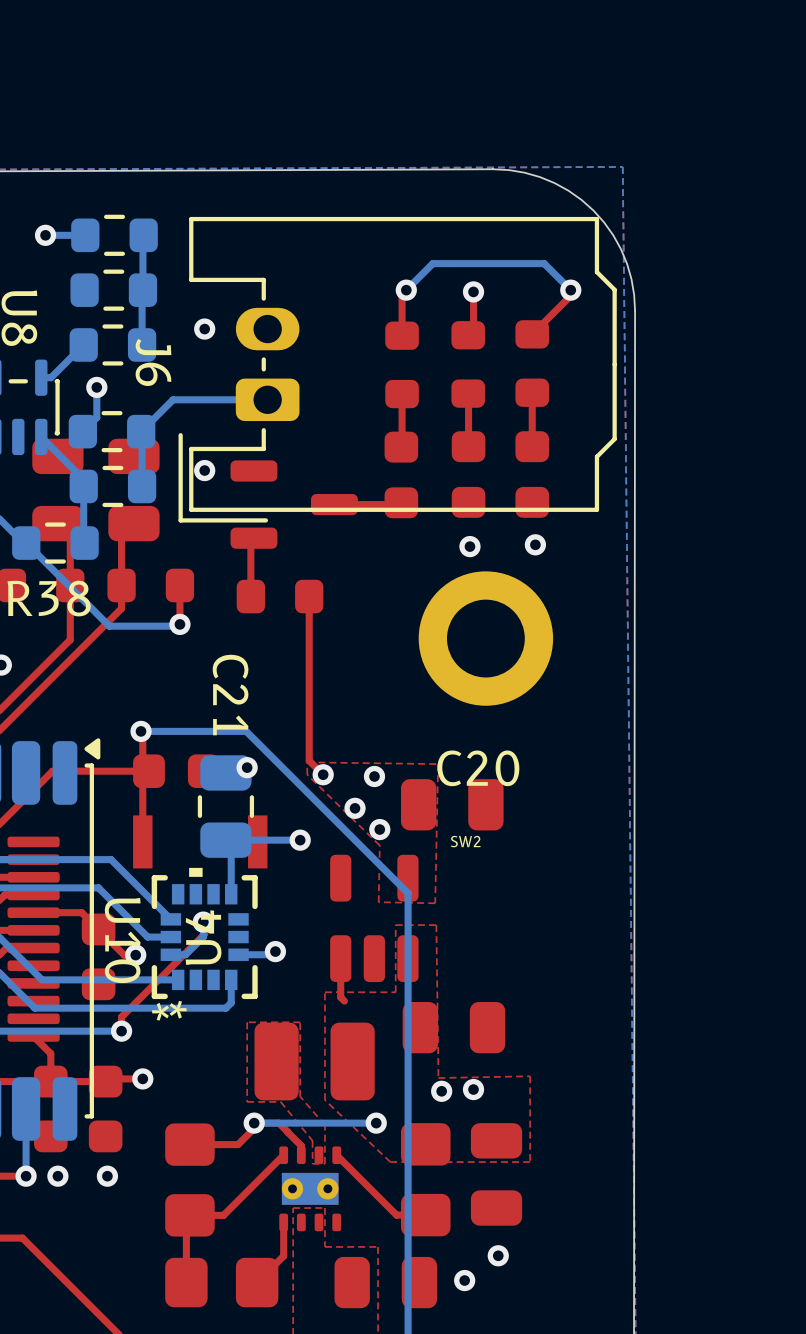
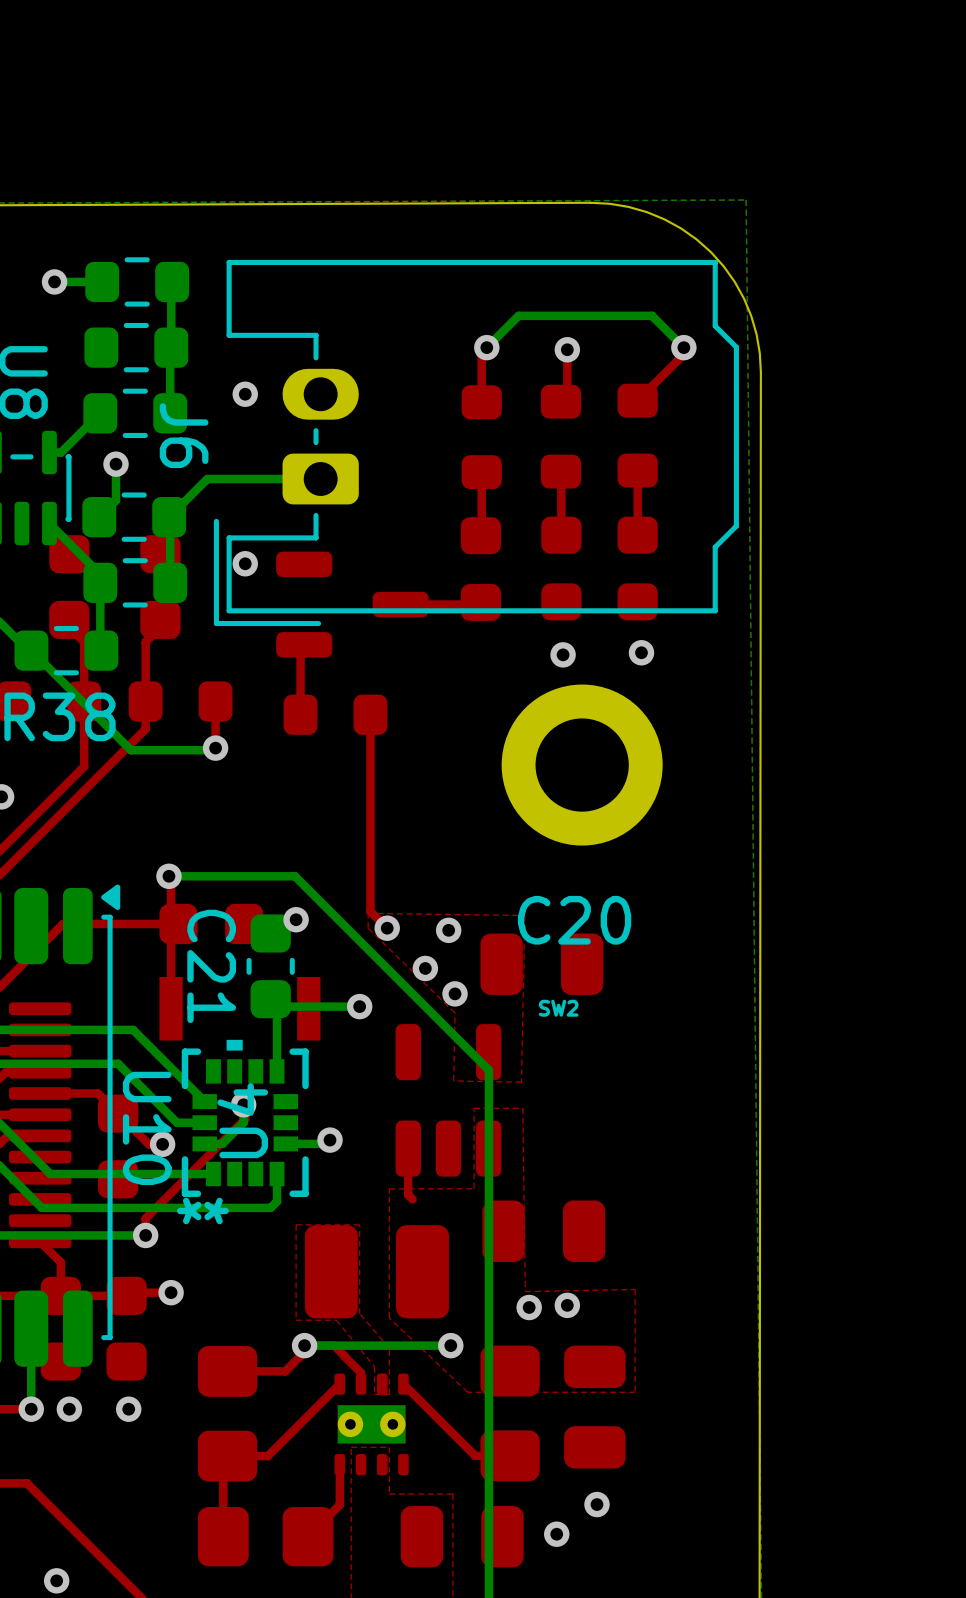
part footprint: [32, 438, 84, 542] -> [49, 535, 90, 639]
part footprint: [108, 438, 160, 542] -> [140, 535, 181, 639]
C21 name position: C21 (230, 695) -> C21 (211, 966)
C21 footprint: [197, 755, 255, 858] -> [246, 914, 295, 1019]
via: none -> (56, 1580)

